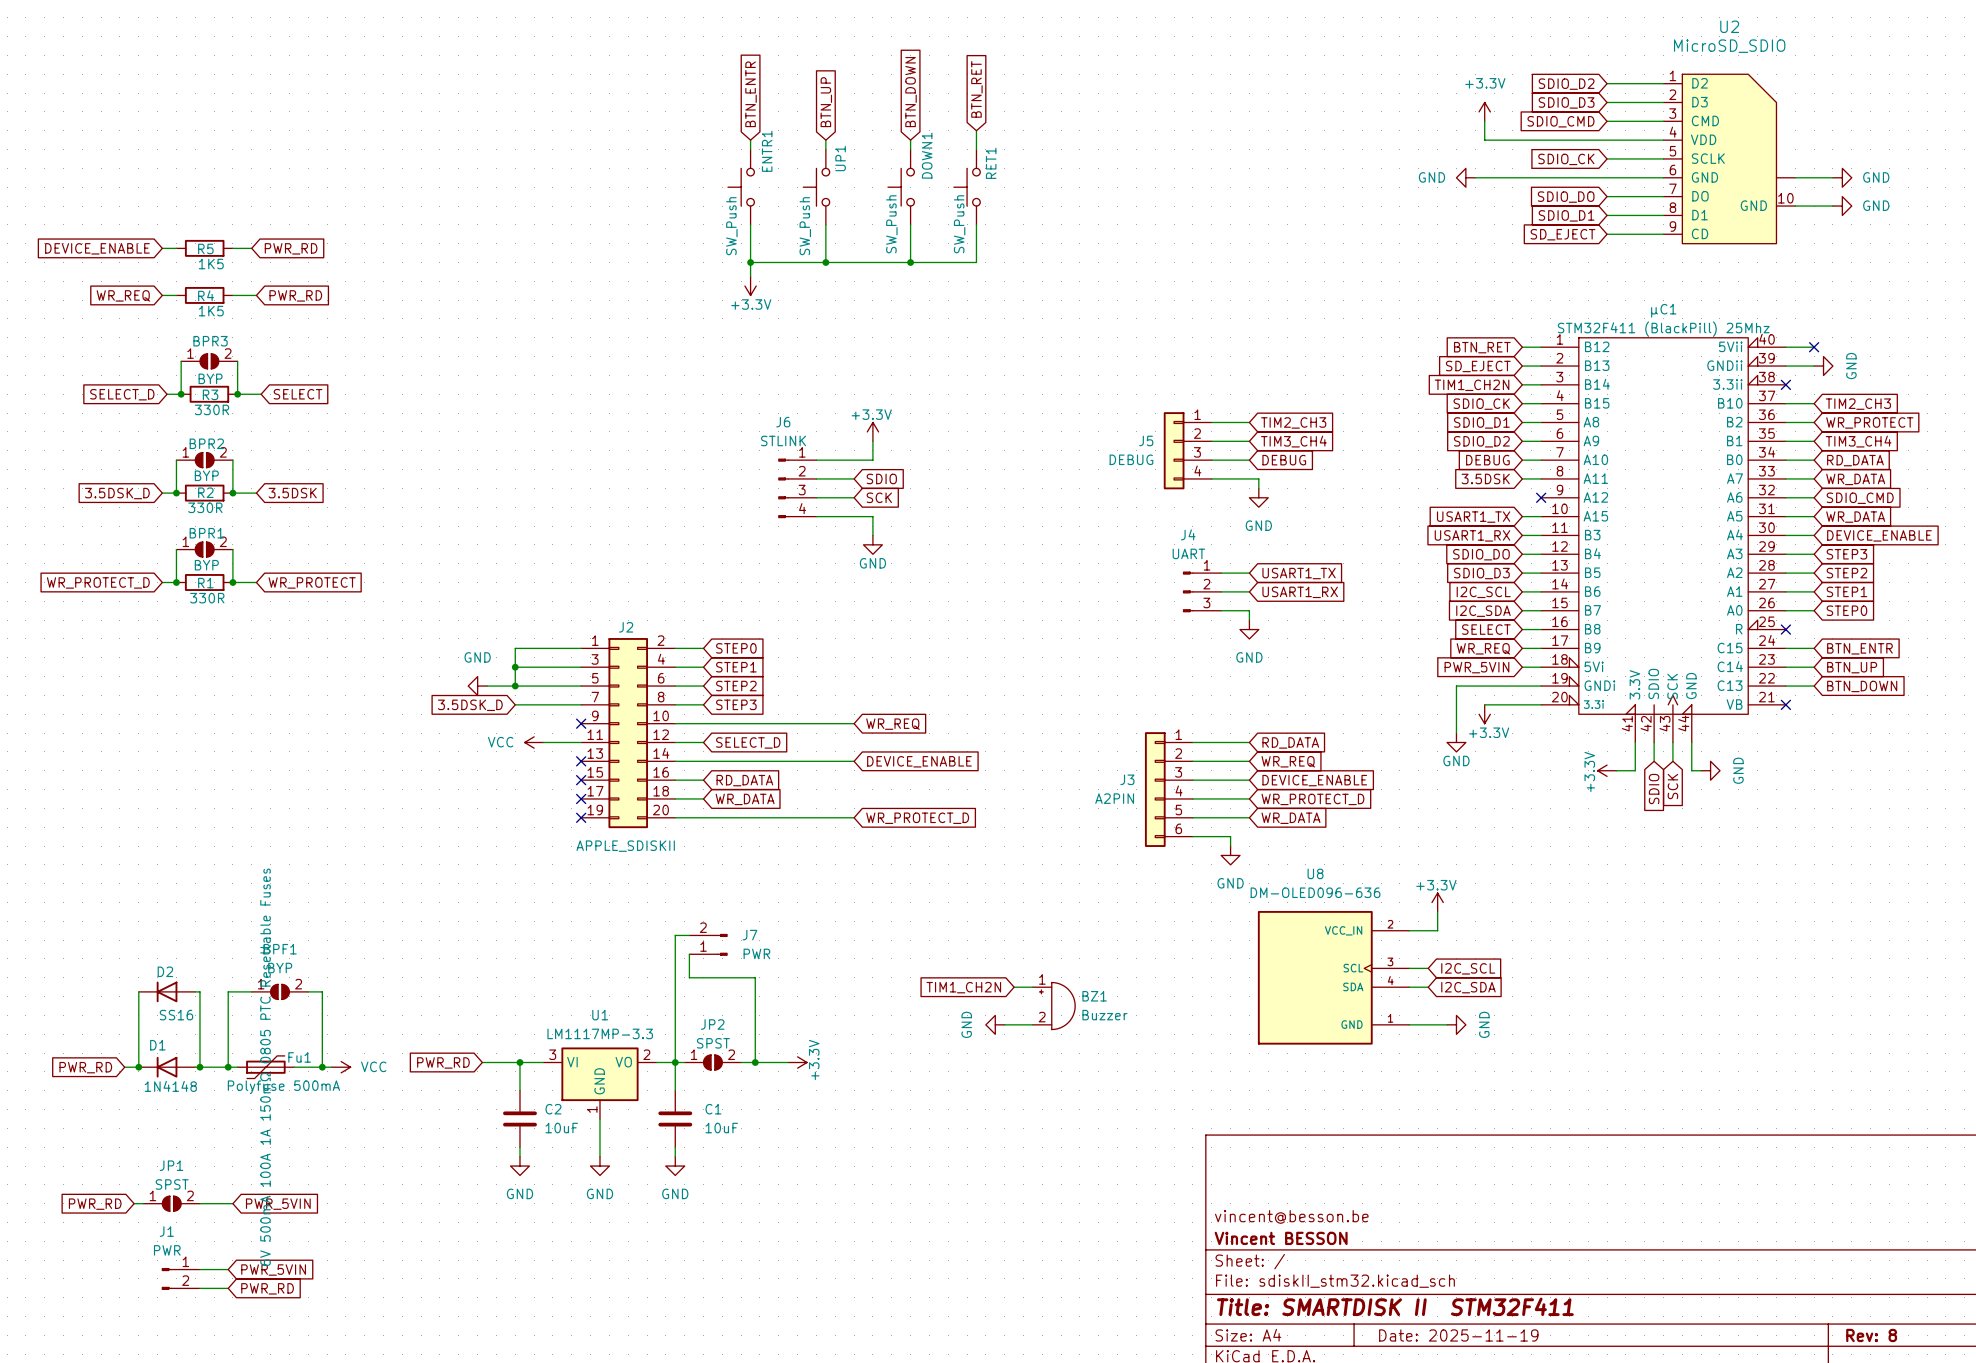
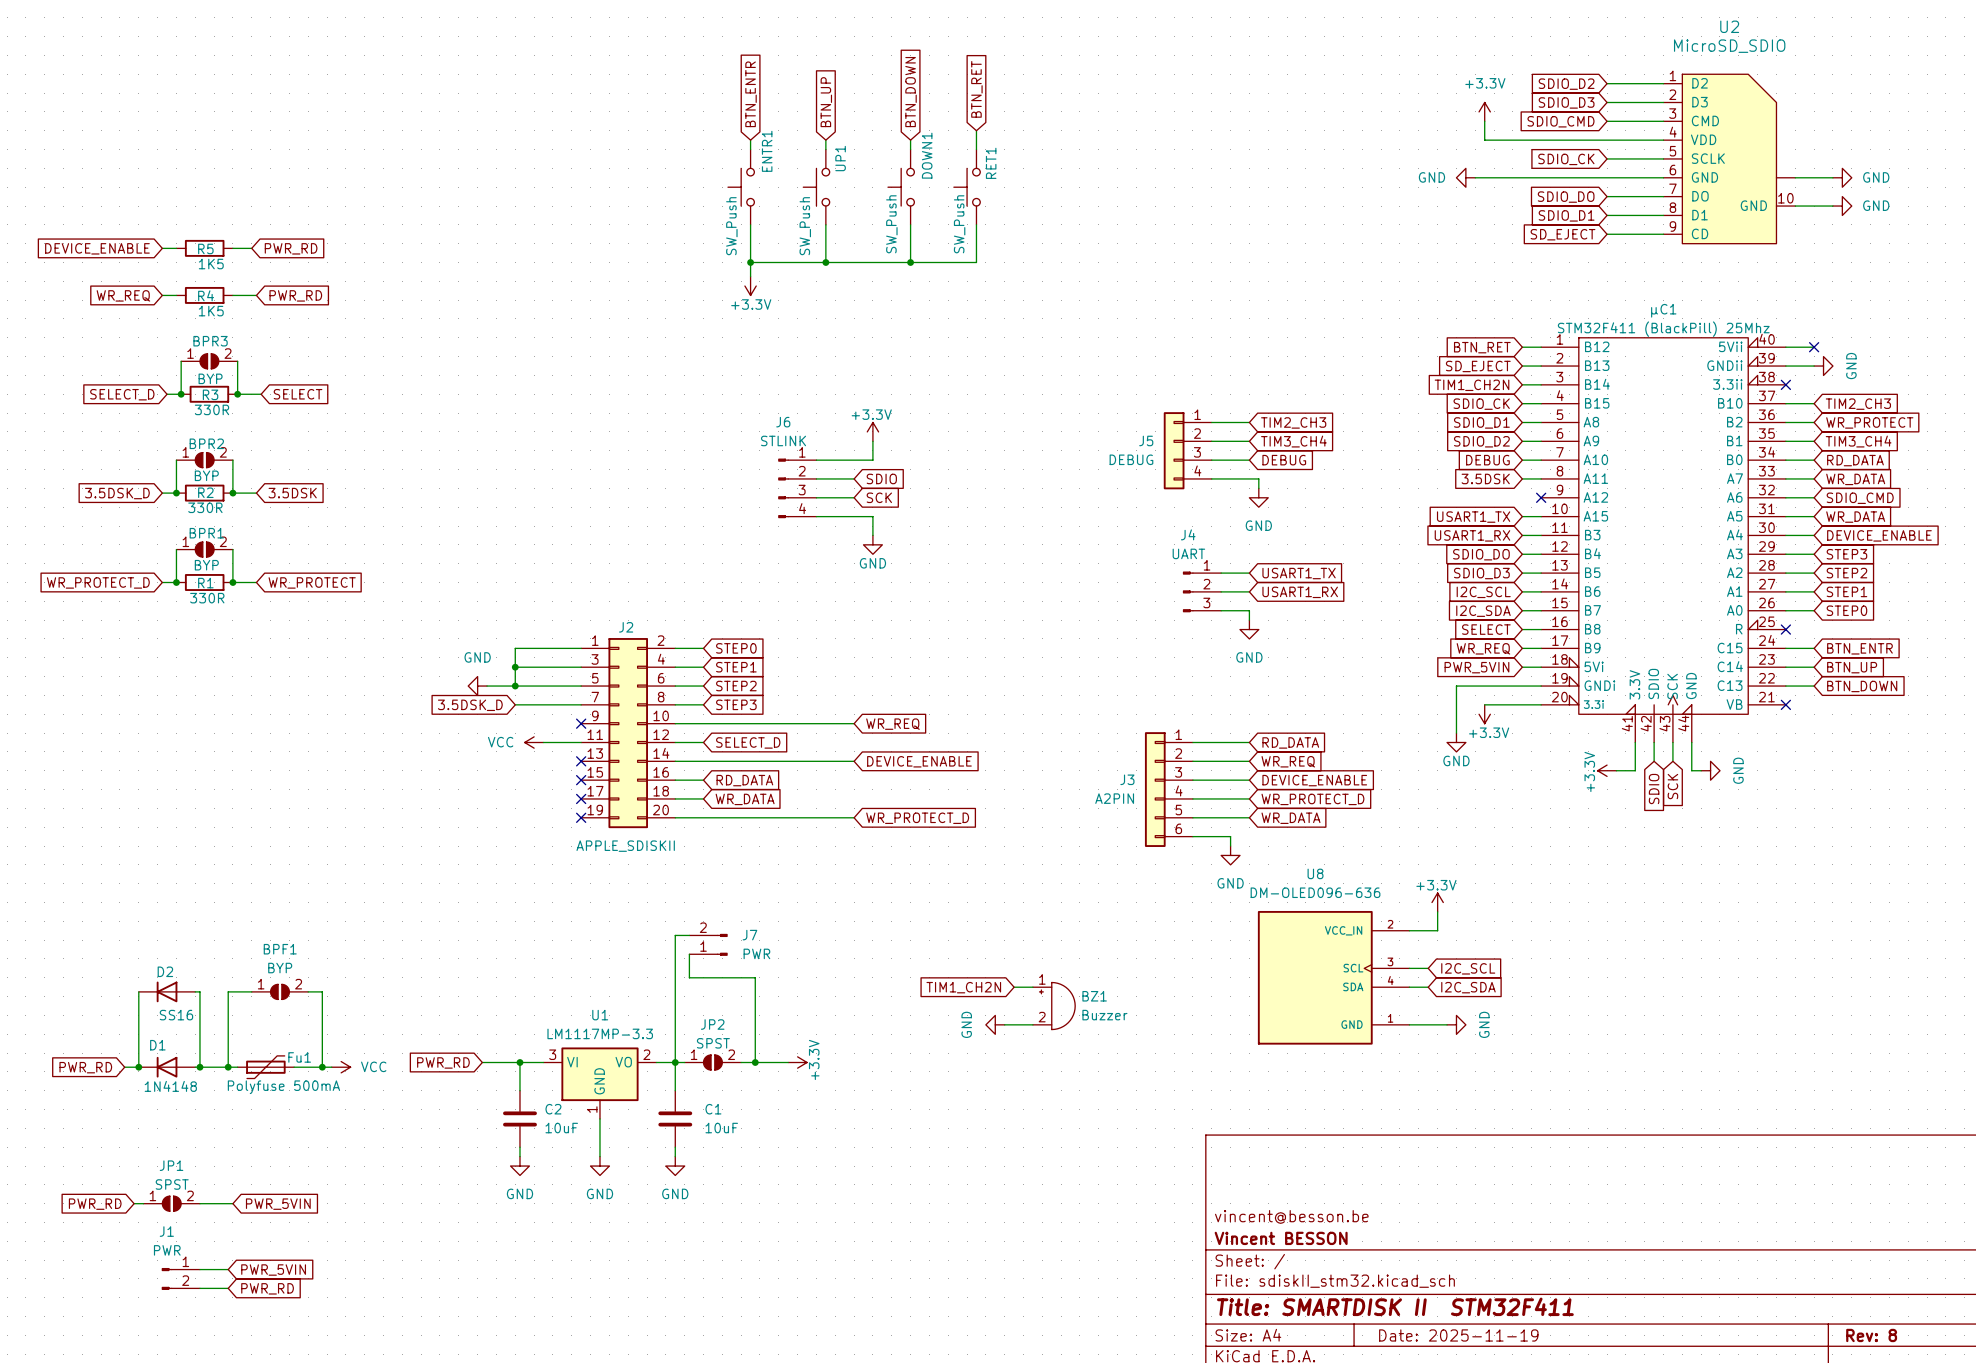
Fu1 text: 6V 500mA 100A 1A 150mΩ 0805 PTC Resettable Fuses (265, 1067) -> none

